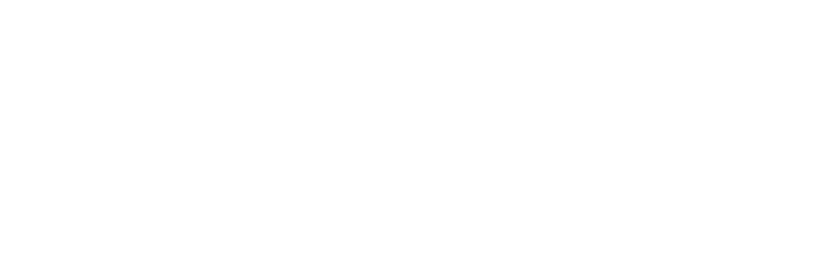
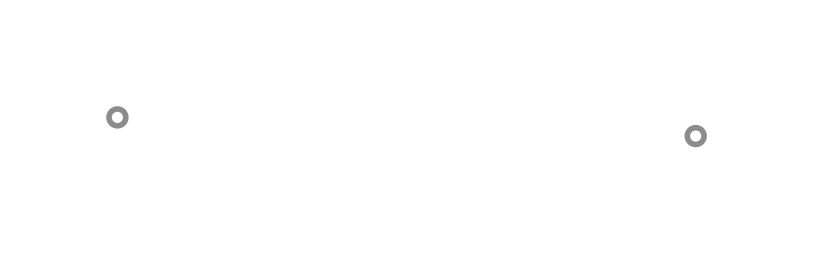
via: none -> (117, 117)
via: none -> (695, 136)

